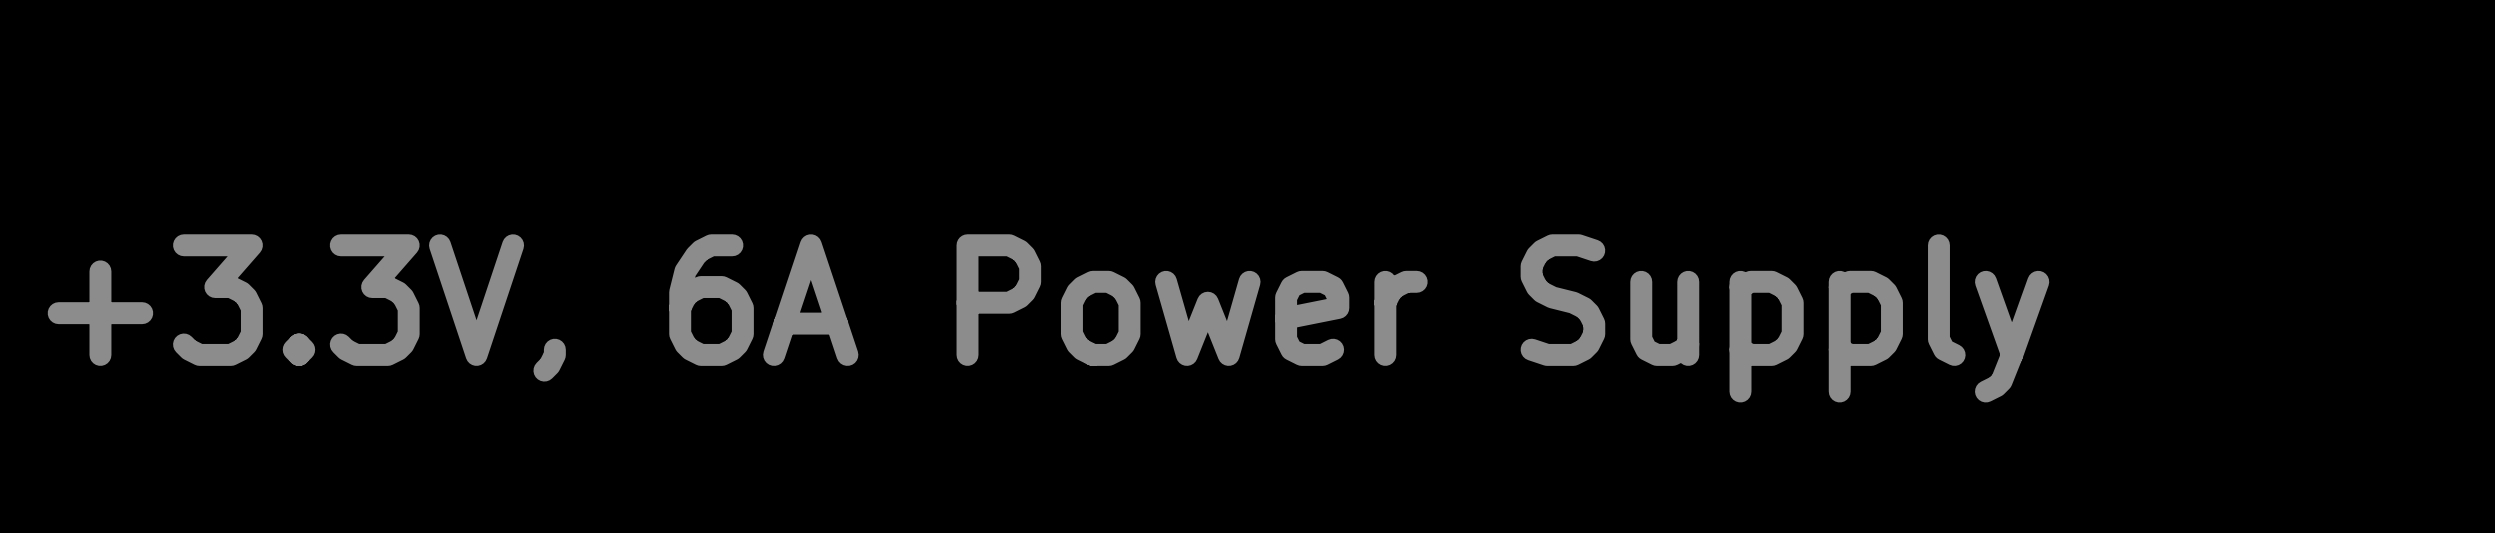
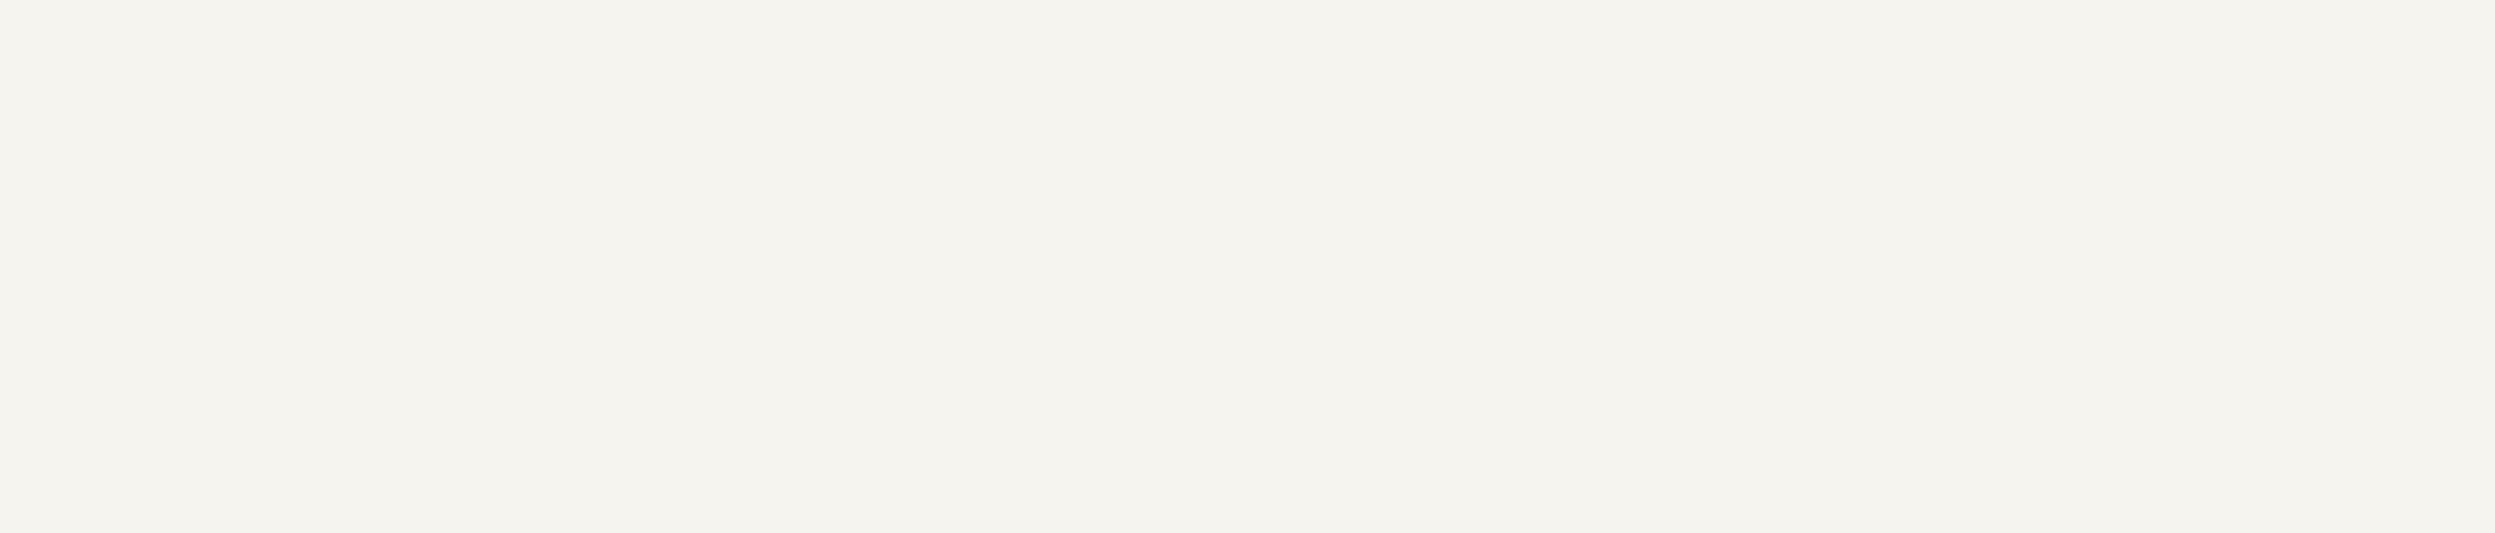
text: +3.3V, 6A Power Supply (1048, 318) -> none

